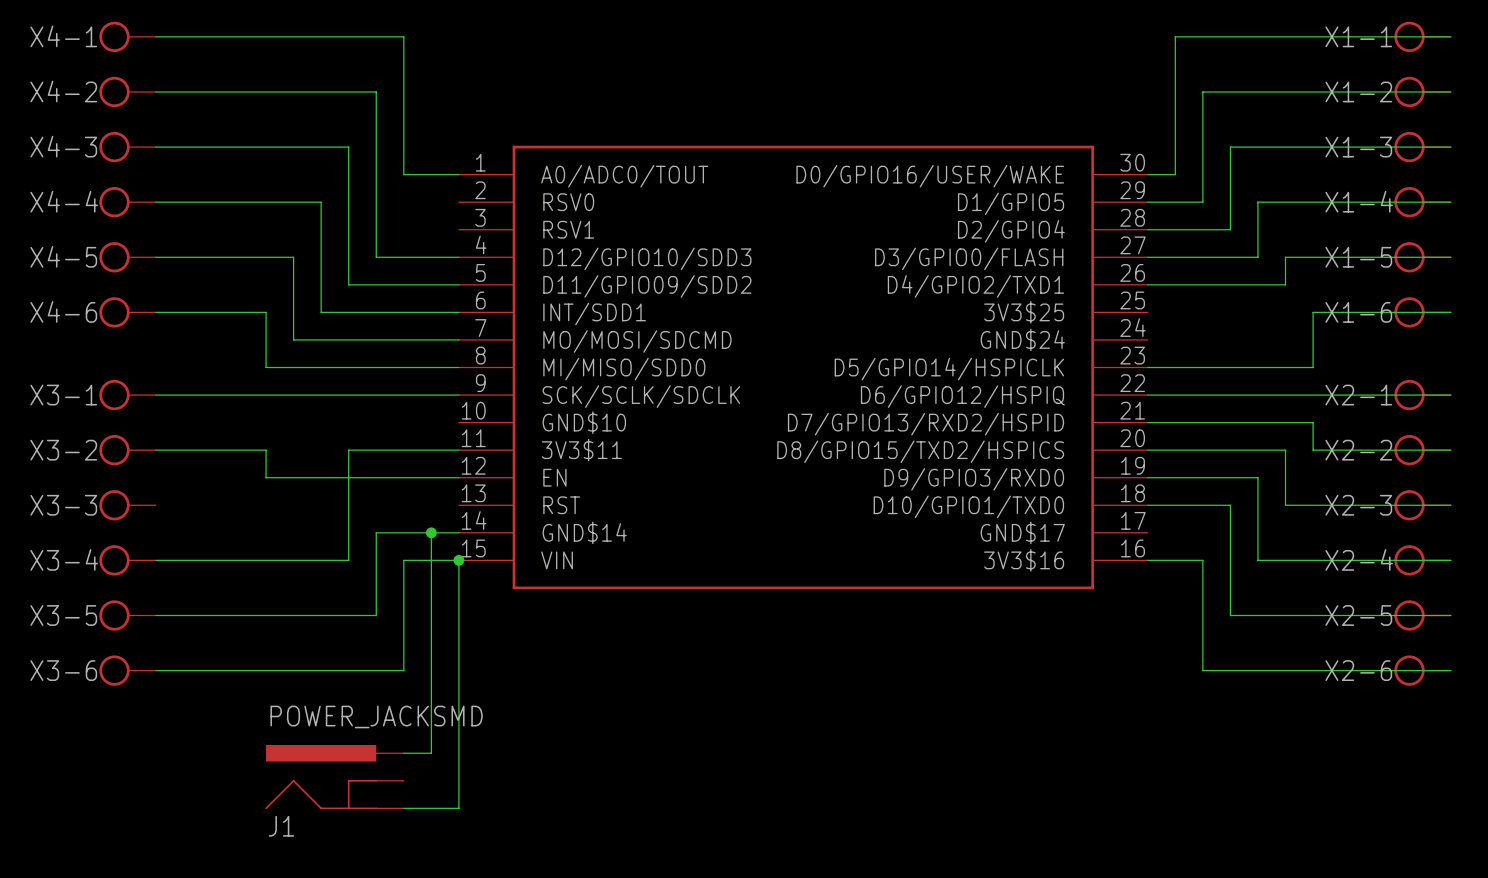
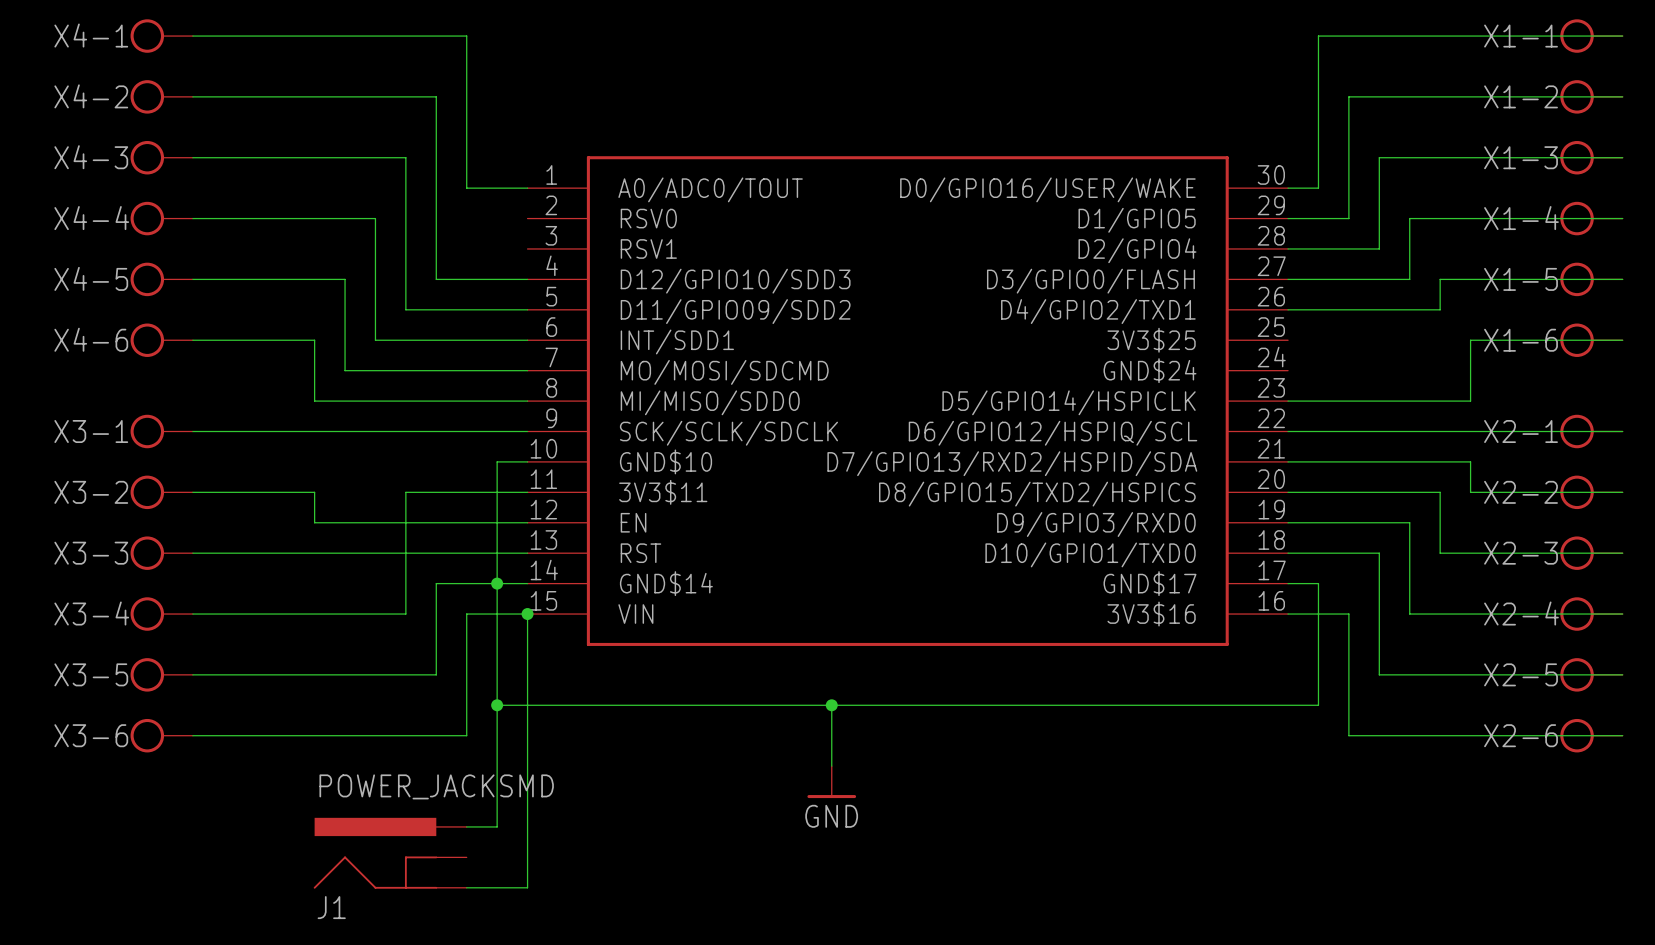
part pin name: D6/GPIO12/HSPIQ (962, 396) -> D6/GPIO12/HSPIQ/SCL (1053, 433)
wire: none -> (527, 461) (497, 461) (497, 583)
part pin name: D7/GPIO13/RXD2/HSPID (926, 424) -> D7/GPIO13/RXD2/HSPID/SDA (1012, 463)
wire: none -> (192, 553) (527, 553)
wire: none -> (1288, 583) (1318, 583) (1318, 705) (497, 705)
junction: none -> (497, 705)
wire: none -> (831, 705) (831, 766)
junction: none -> (831, 705)
power symbol: none -> GND (831, 782)

